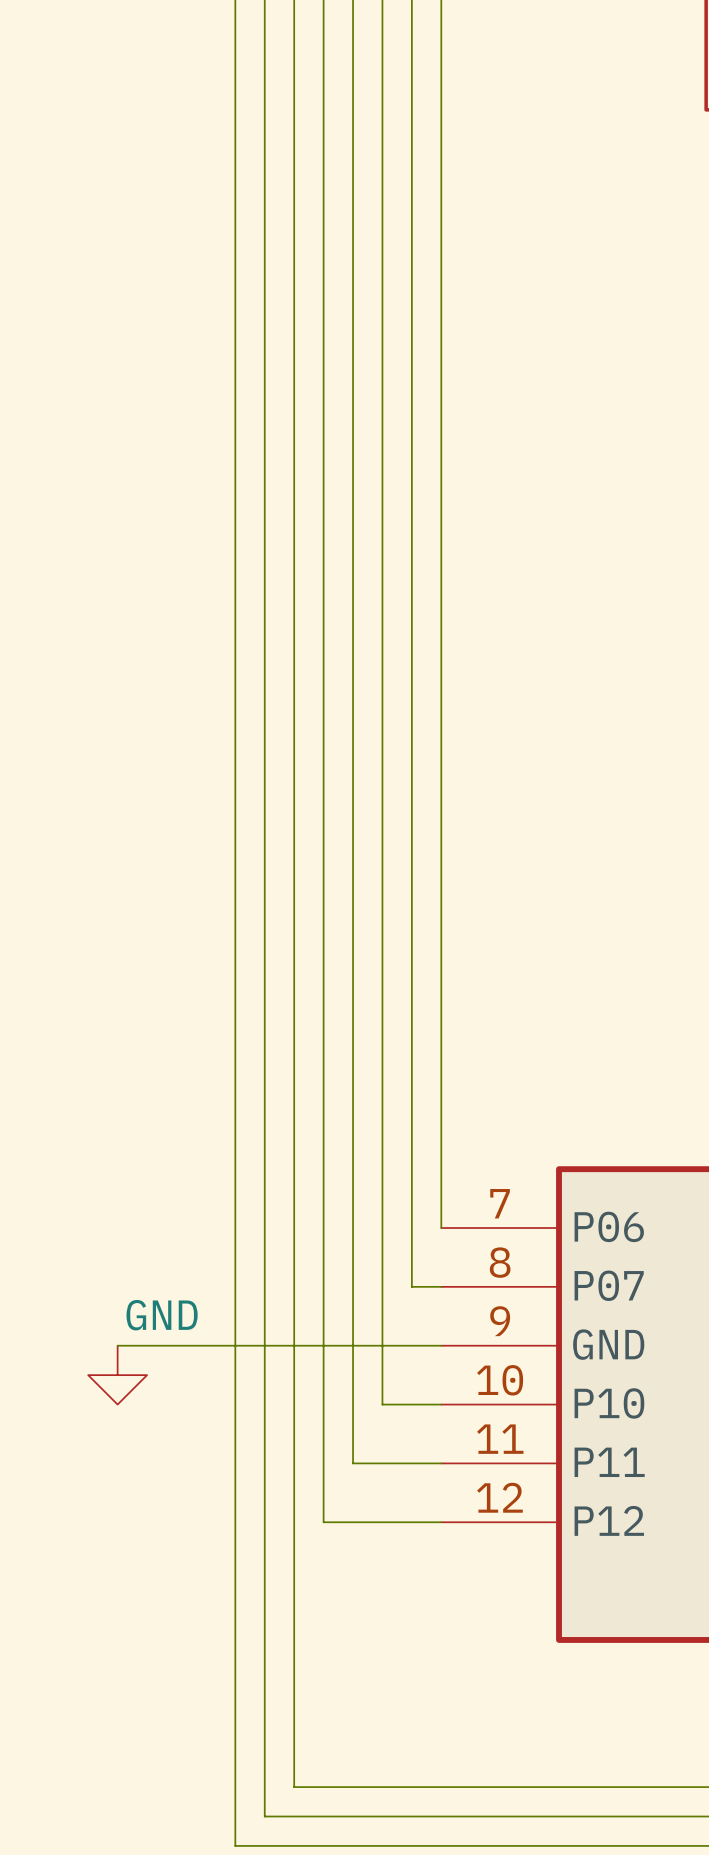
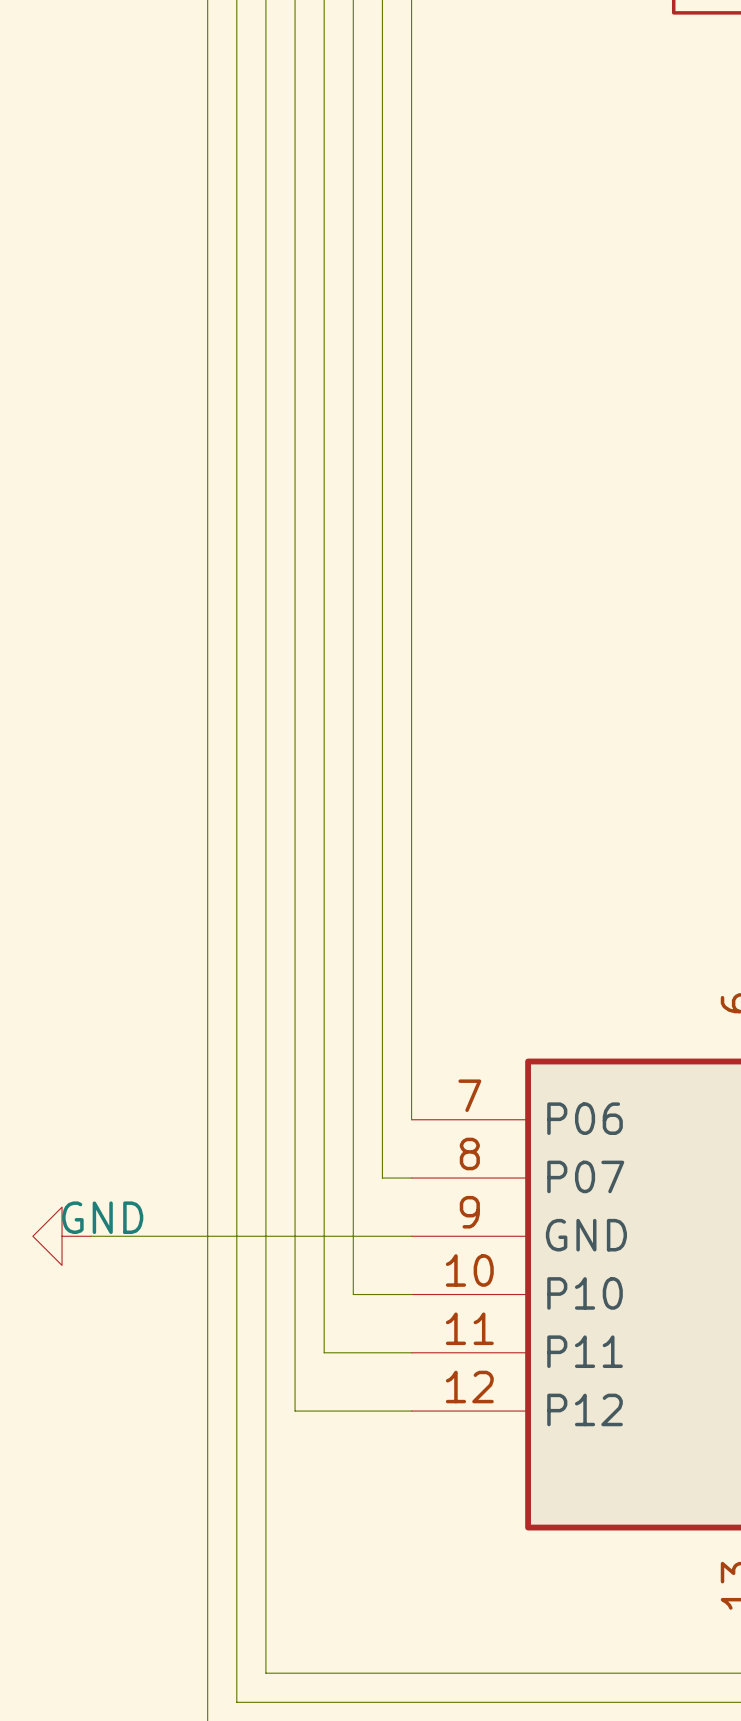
power symbol rotation: 0° (117, 1375) -> 90° clockwise (62, 1236)
power symbol position: GND (117, 1375) -> GND (62, 1236)

